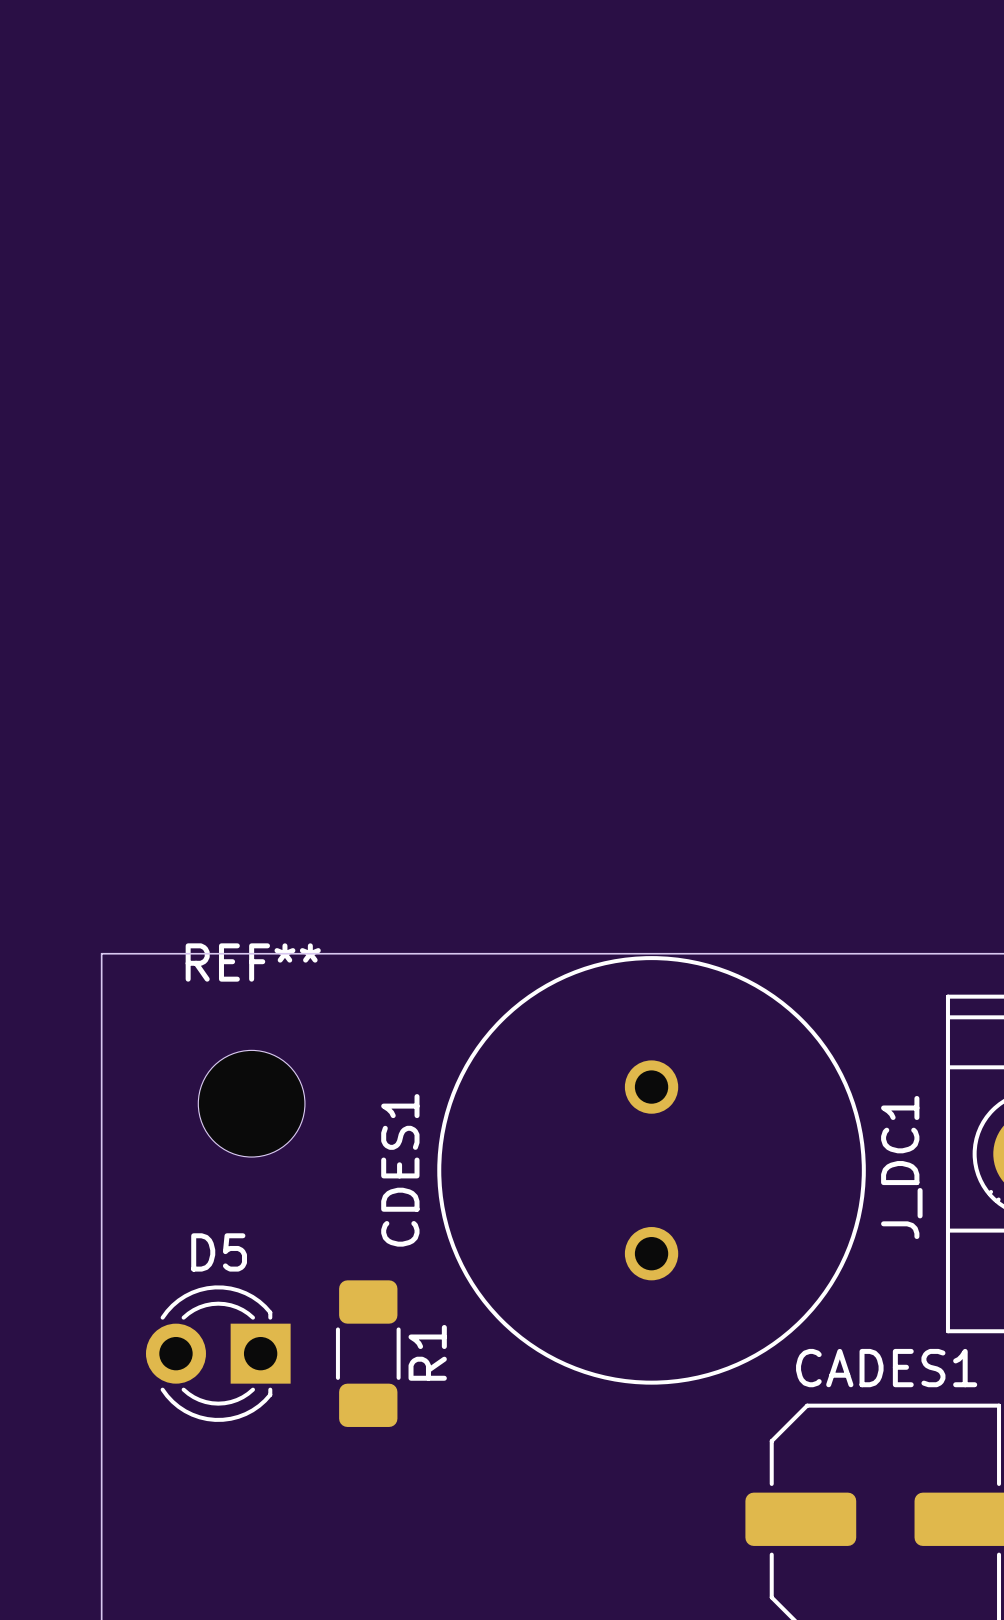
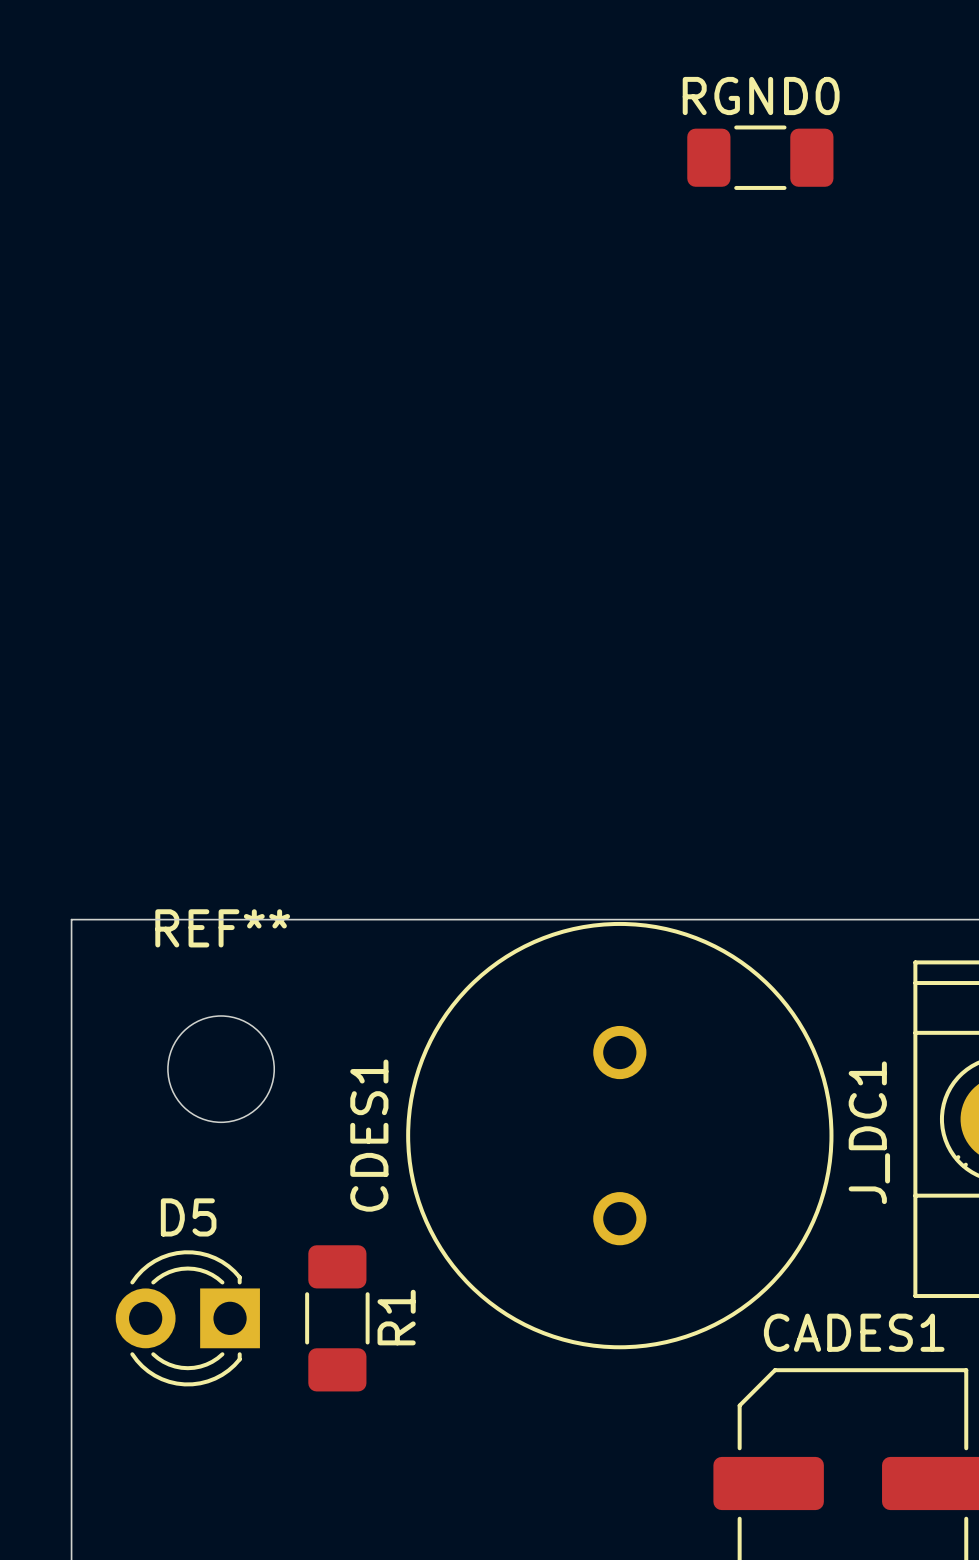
RGND0: none -> (760, 157)

